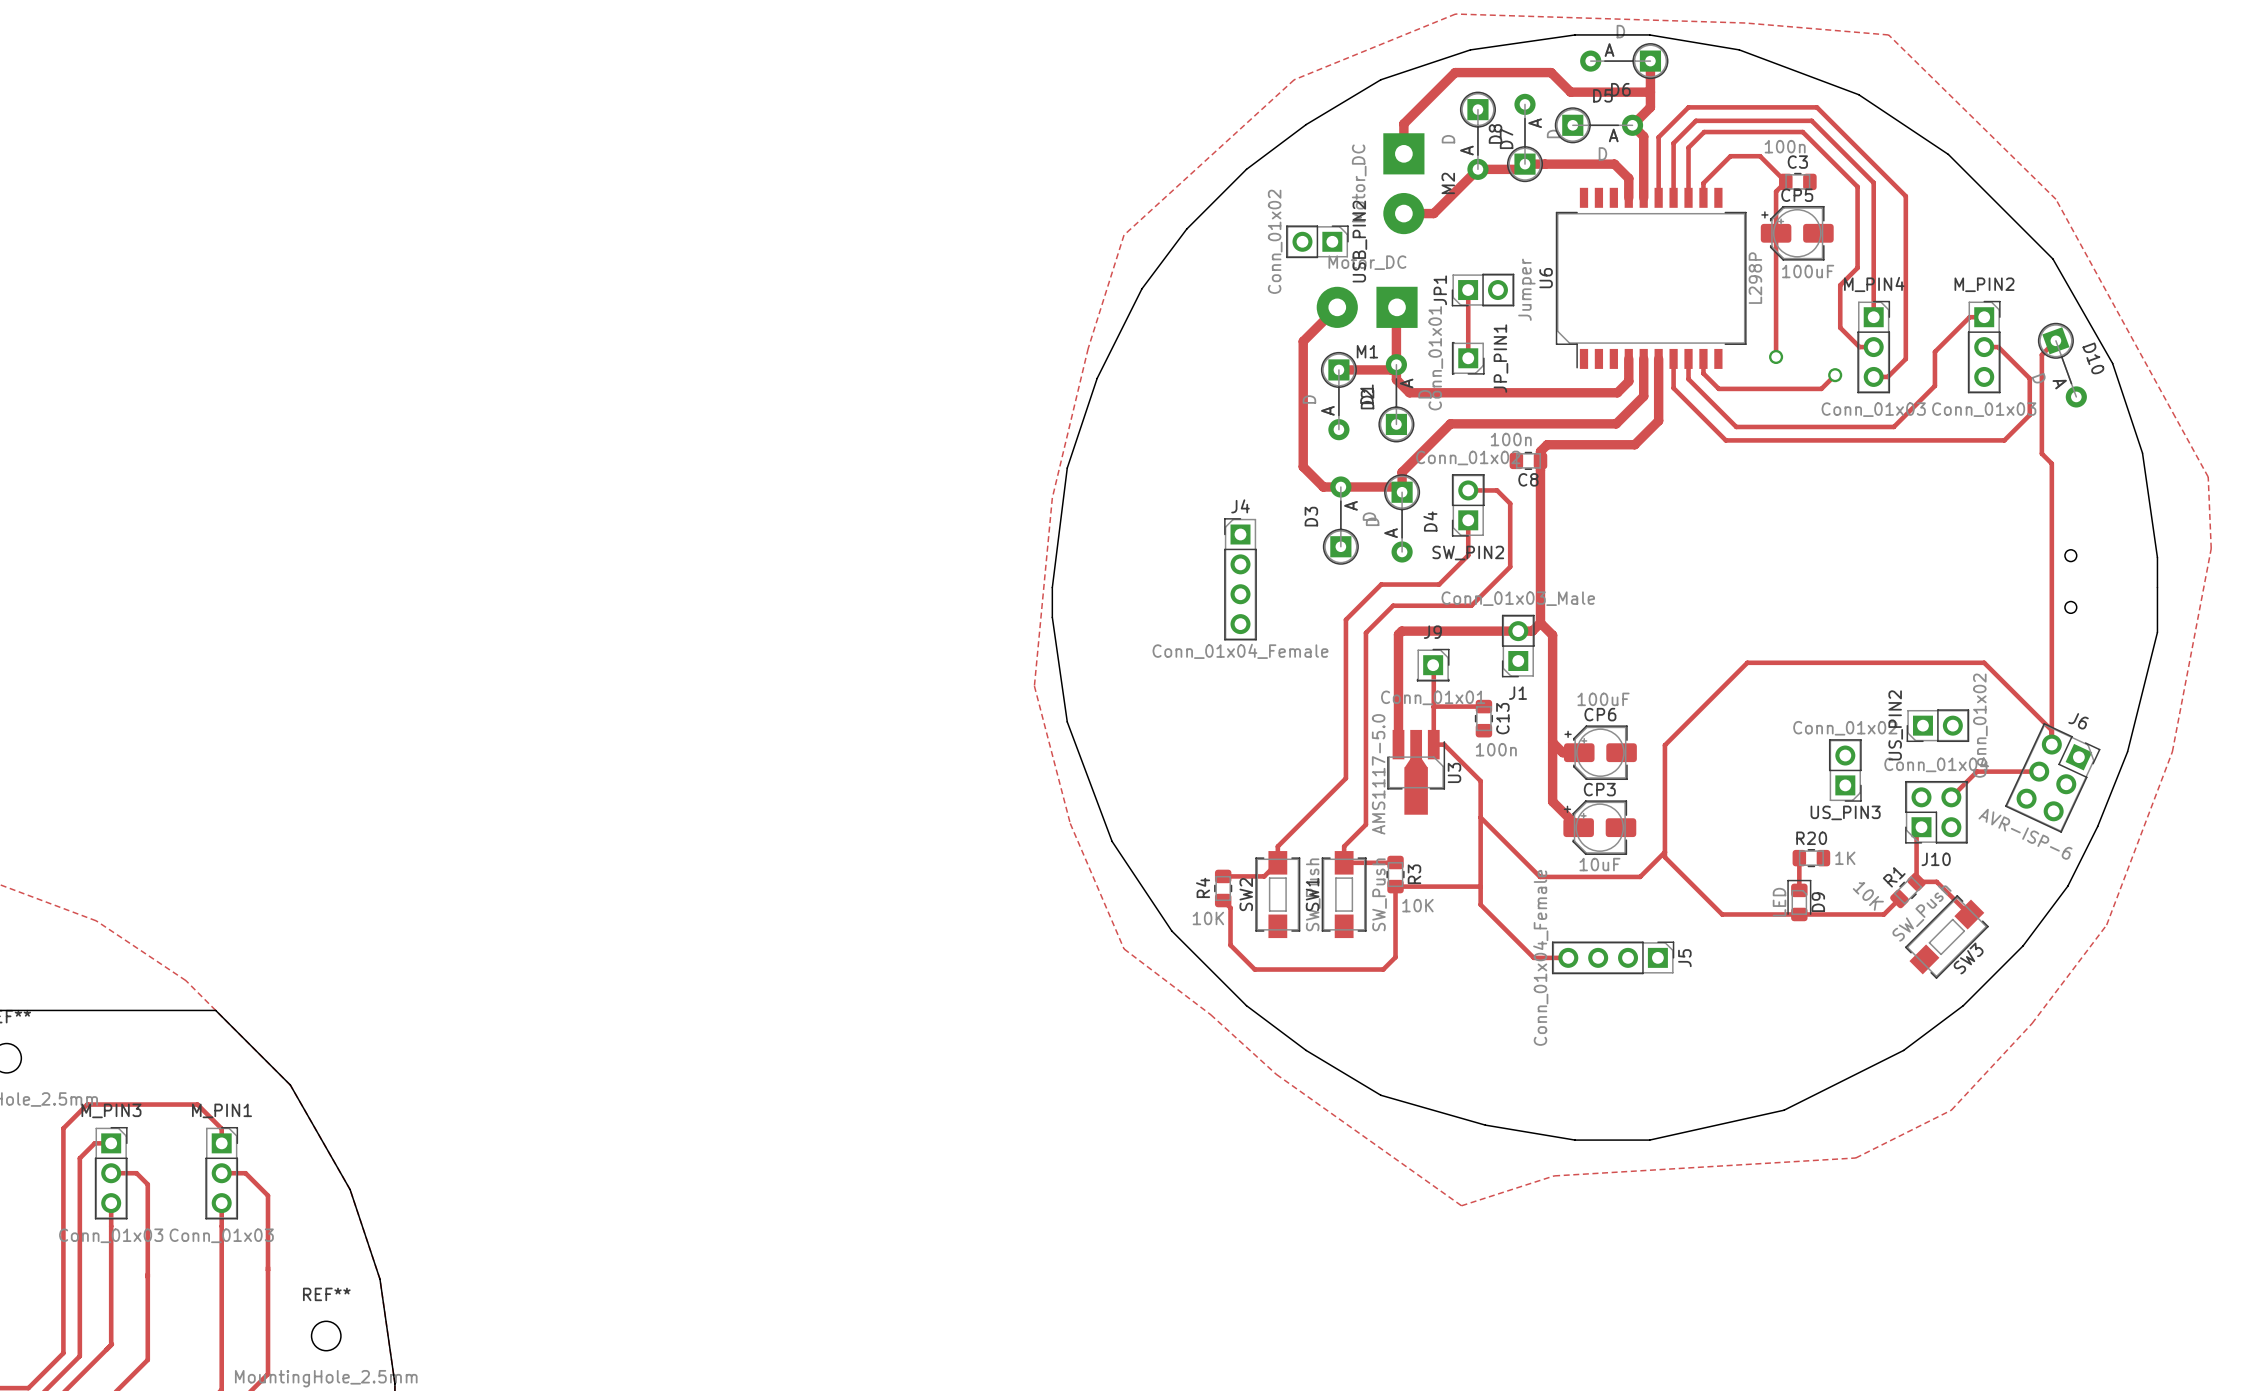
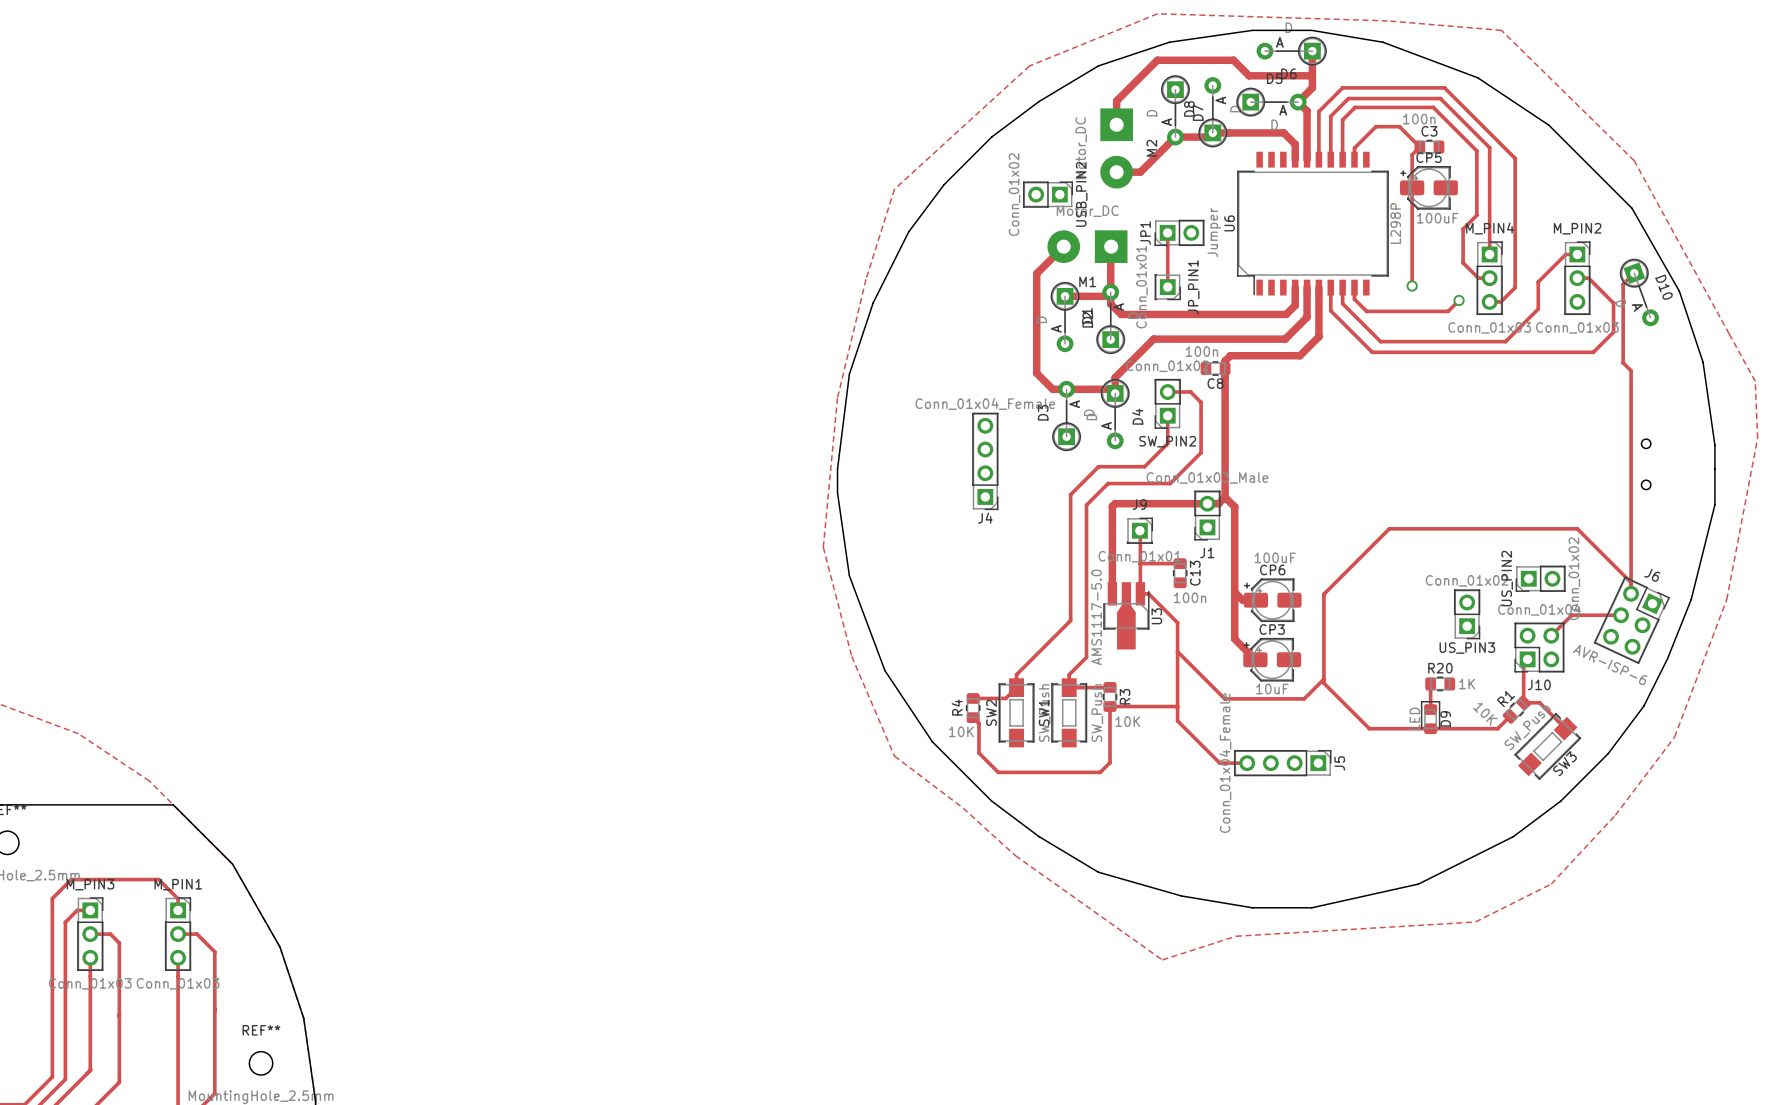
J4 rotation: 0° (1240, 579) -> 180° (985, 461)

